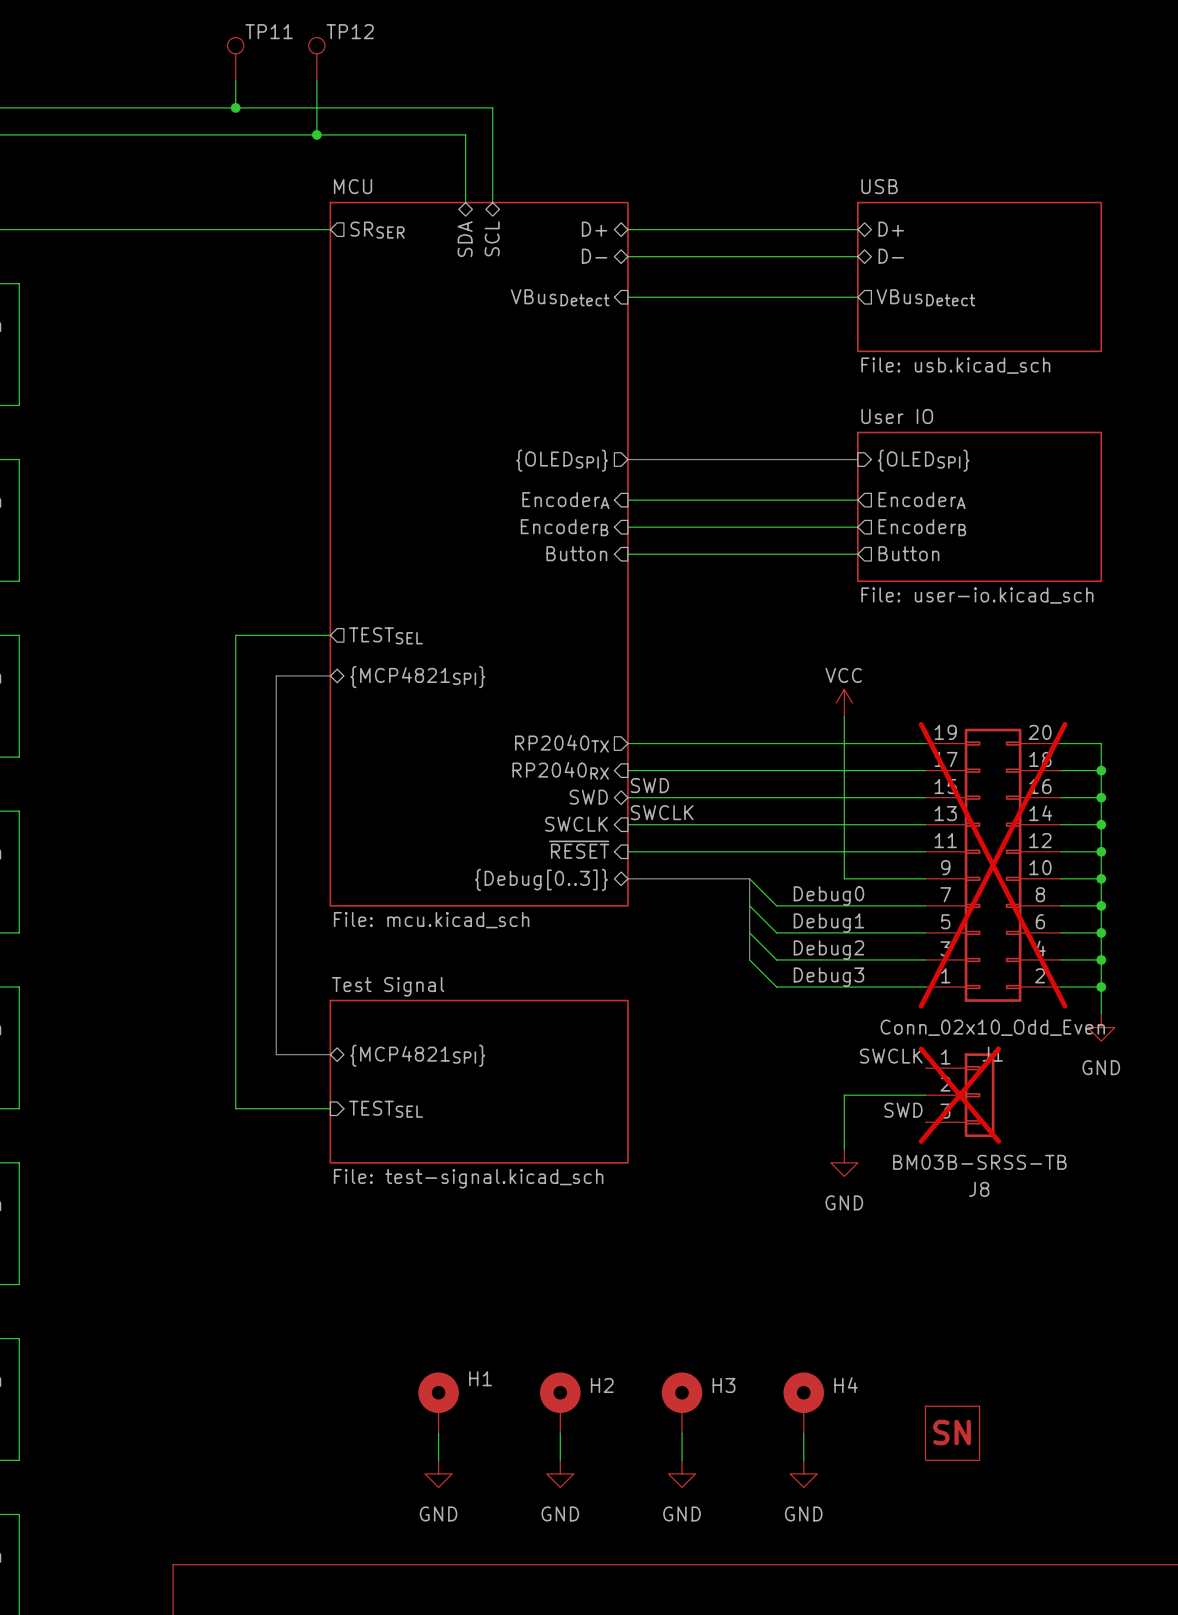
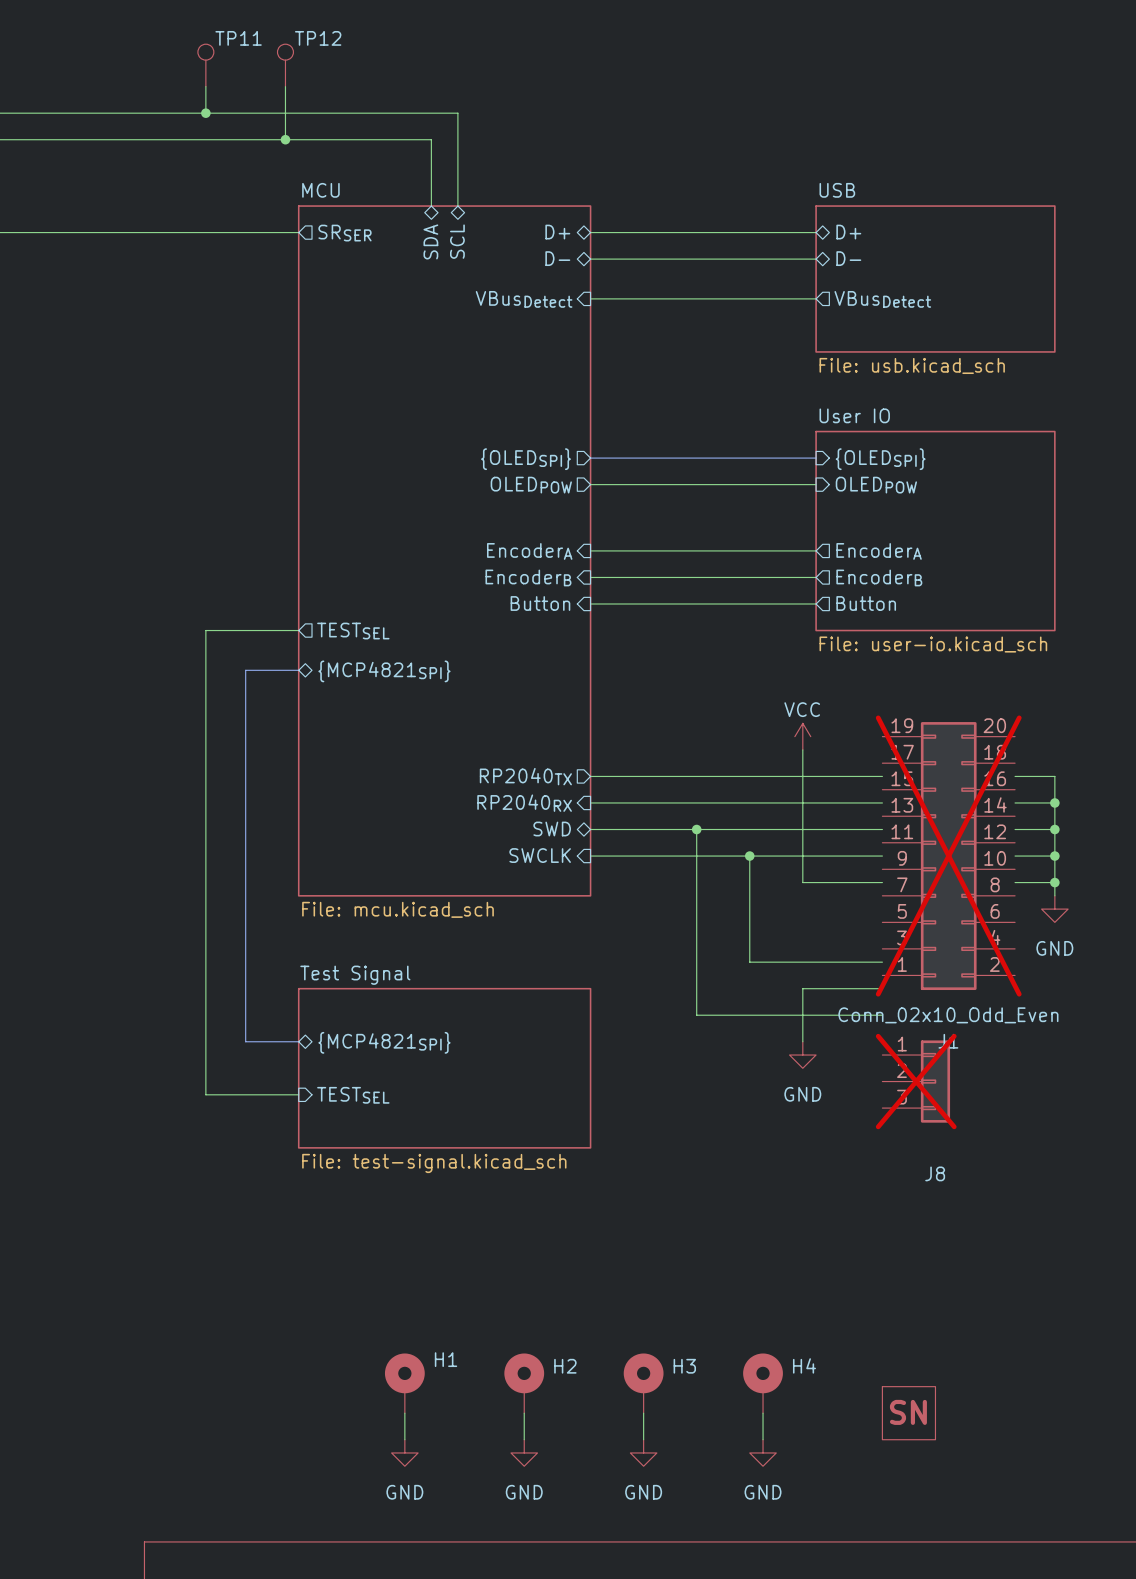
sheet pin: none -> OLEDPOW (531, 485)
sheet pin: none -> OLEDPOW (876, 485)
sheet pin: EncoderA (565, 500) -> none
wire: (627, 500) (857, 500) -> (590, 484) (816, 484)
sheet pin: EncoderA (922, 500) -> none
sheet User IO: File: user-io.kicad_sch (979, 506) -> none
sheet pin position: EncoderB (564, 527) -> EncoderB (528, 577)
wire: (627, 527) (857, 527) -> (590, 604) (816, 604)
sheet pin position: EncoderB (922, 527) -> EncoderB (879, 577)
sheet User IO: none -> File: user-io.kicad_sch (935, 531)
sheet pin: Button (576, 553) -> EncoderA (529, 551)
sheet pin: Button (908, 553) -> EncoderA (879, 551)
wire: none -> (590, 577) (816, 577)
sheet pin: none -> Button (540, 603)
sheet pin: none -> Button (866, 603)
power symbol position: VCC (844, 702) -> VCC (802, 736)
sheet pin position: RP2040TX (561, 743) -> RP2040TX (525, 776)
wire: (627, 743) (925, 743) -> none
wire: (1060, 743) (1101, 743) (1101, 784) -> (1015, 776) (1054, 776)
sheet pin position: RP2040RX (560, 770) -> RP2040RX (524, 803)
wire: (627, 770) (925, 770) -> (590, 776) (882, 776)
wire: (1060, 770) (1101, 770) -> none
junction: (1101, 770) -> none
label: SWD (649, 785) -> none
sheet pin position: SWD (588, 797) -> SWD (552, 829)
wire: (627, 797) (925, 797) -> (590, 802) (882, 802)
wire: (1060, 797) (1101, 797) -> (1015, 802) (1054, 802)
junction: (1101, 797) -> none
junction: none -> (1054, 802)
label: SWCLK (662, 812) -> none
sheet pin position: SWCLK (576, 824) -> SWCLK (540, 855)
wire: (627, 824) (925, 824) -> (590, 829) (882, 829)
wire: (1060, 824) (1101, 824) -> (1015, 829) (1054, 829)
junction: (1101, 824) -> none
wire: none -> (696, 829) (696, 1015) (882, 1015)
junction: none -> (696, 829)
junction: none -> (1054, 829)
sheet pin: ~{RESET} (579, 849) -> none
wire: (627, 851) (925, 851) -> (590, 856) (882, 856)
wire: (1060, 851) (1101, 851) -> (1015, 856) (1054, 856)
junction: (1101, 851) -> none
wire: none -> (749, 856) (749, 962) (882, 962)
junction: none -> (749, 856)
junction: none -> (1054, 856)
bus: (627, 878) (749, 878) (749, 959) -> none
wire: (749, 878) (776, 905) (925, 905) -> none
wire: (844, 878) (925, 878) -> (802, 869) (802, 882) (882, 882)
wire: (1060, 878) (1101, 878) -> (1015, 882) (1054, 882)
junction: (1101, 878) -> none
sheet pin: {Debug[0..3]} (541, 879) -> none
junction: none -> (1054, 882)
label: Debug0 (828, 896) -> none
wire: (749, 905) (776, 932) (925, 932) -> none
wire: (1060, 905) (1101, 905) (1101, 1014) -> none
junction: (1101, 905) -> none
label: Debug1 (828, 923) -> none
wire: (749, 932) (776, 959) (925, 959) -> none
wire: (1060, 932) (1101, 932) -> none
junction: (1101, 932) -> none
label: Debug2 (828, 950) -> none
wire: (749, 959) (776, 987) (925, 987) -> none
wire: (1060, 959) (1101, 959) -> none
junction: (1101, 959) -> none
label: Debug3 (828, 977) -> none
wire: (1060, 987) (1101, 987) -> none
junction: (1101, 987) -> none
power symbol position: GND (1101, 1027) -> GND (1054, 909)
label: SWCLK (891, 1056) -> none
wire: (925, 1095) (844, 1095) (844, 1149) -> (882, 988) (802, 988) (802, 1041)
label: SWD (903, 1110) -> none
power symbol position: GND (844, 1162) -> GND (802, 1055)
J8 value: BM03B-SRSS-TB (979, 1162) -> none

